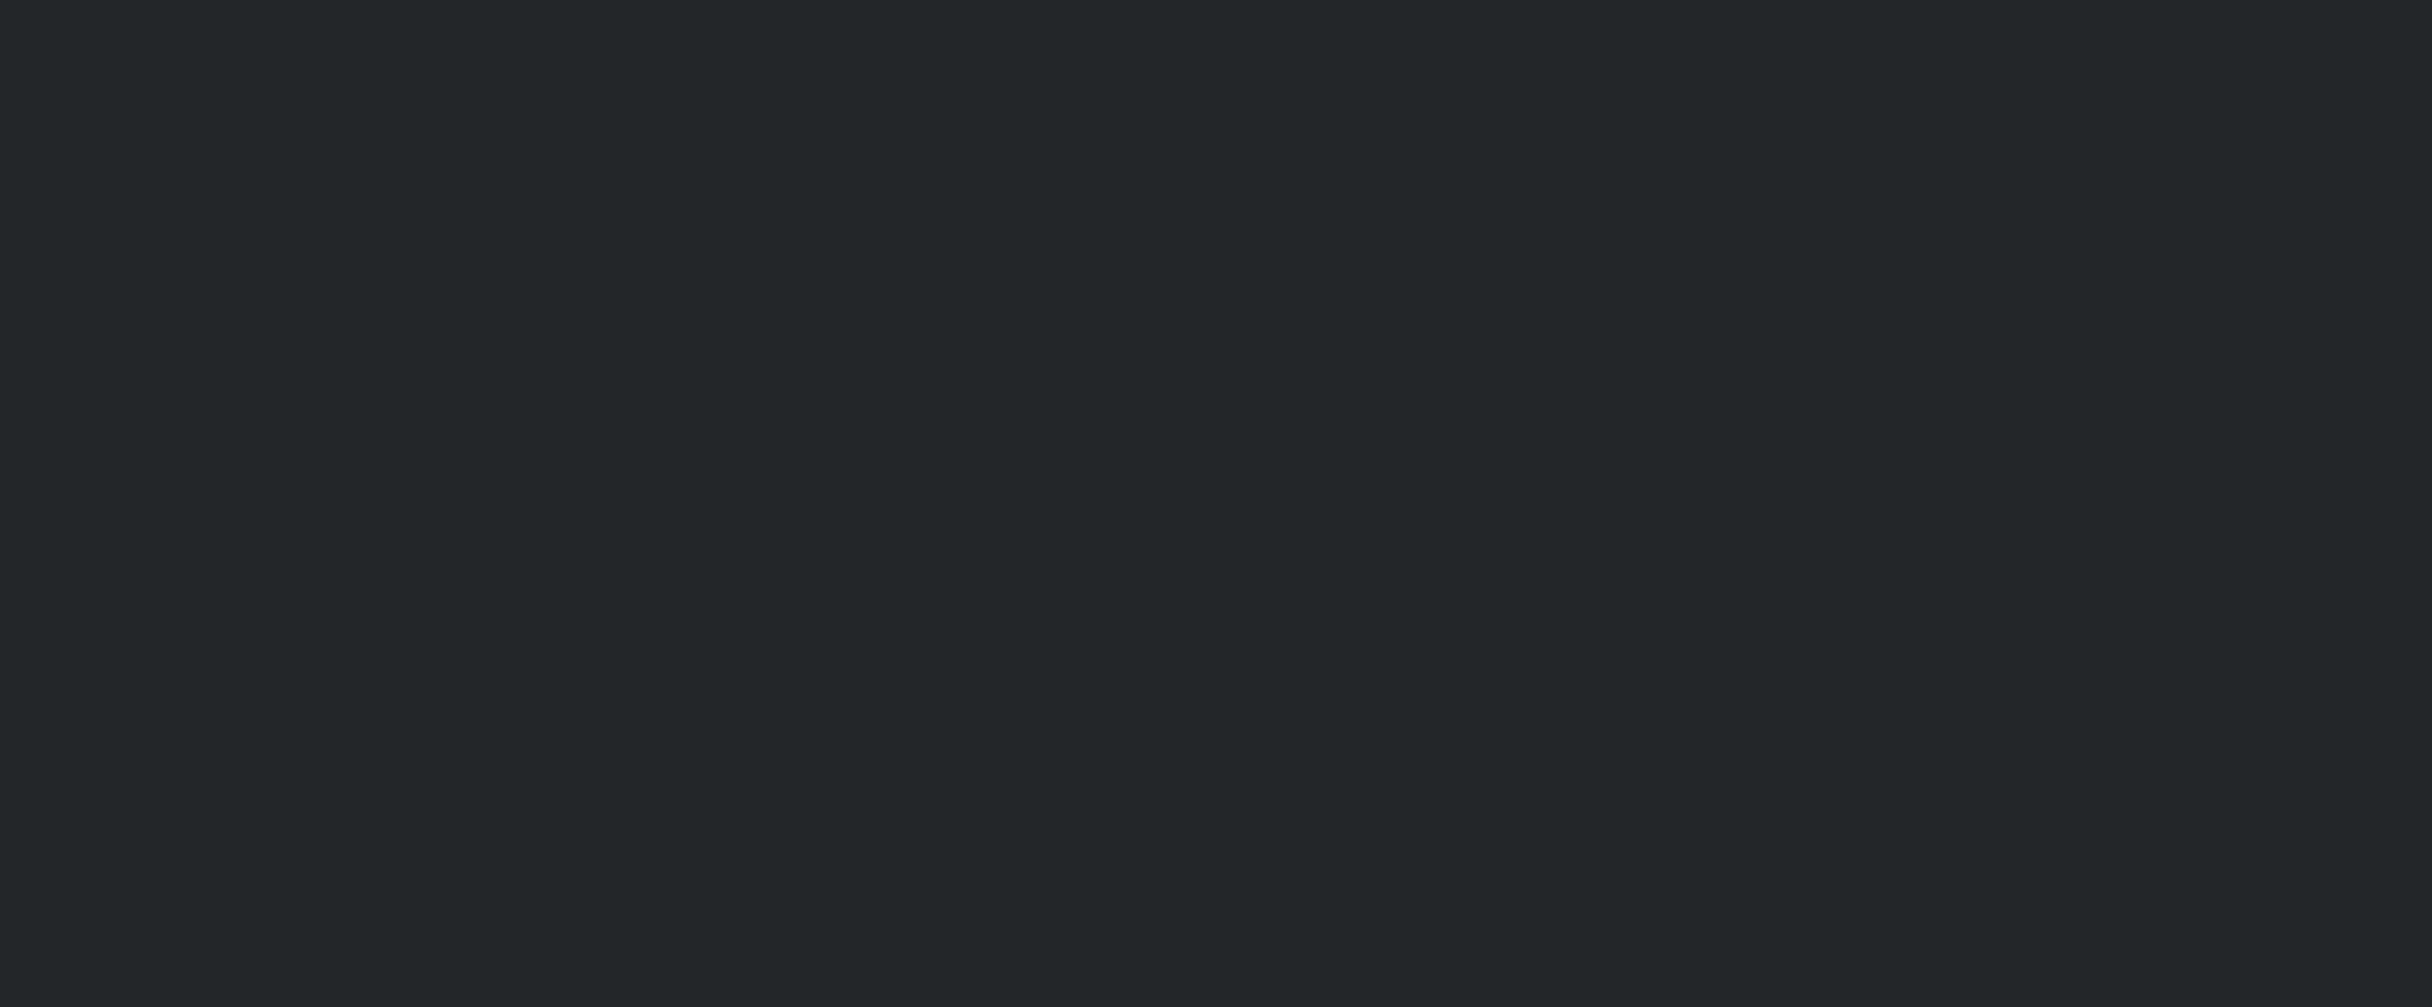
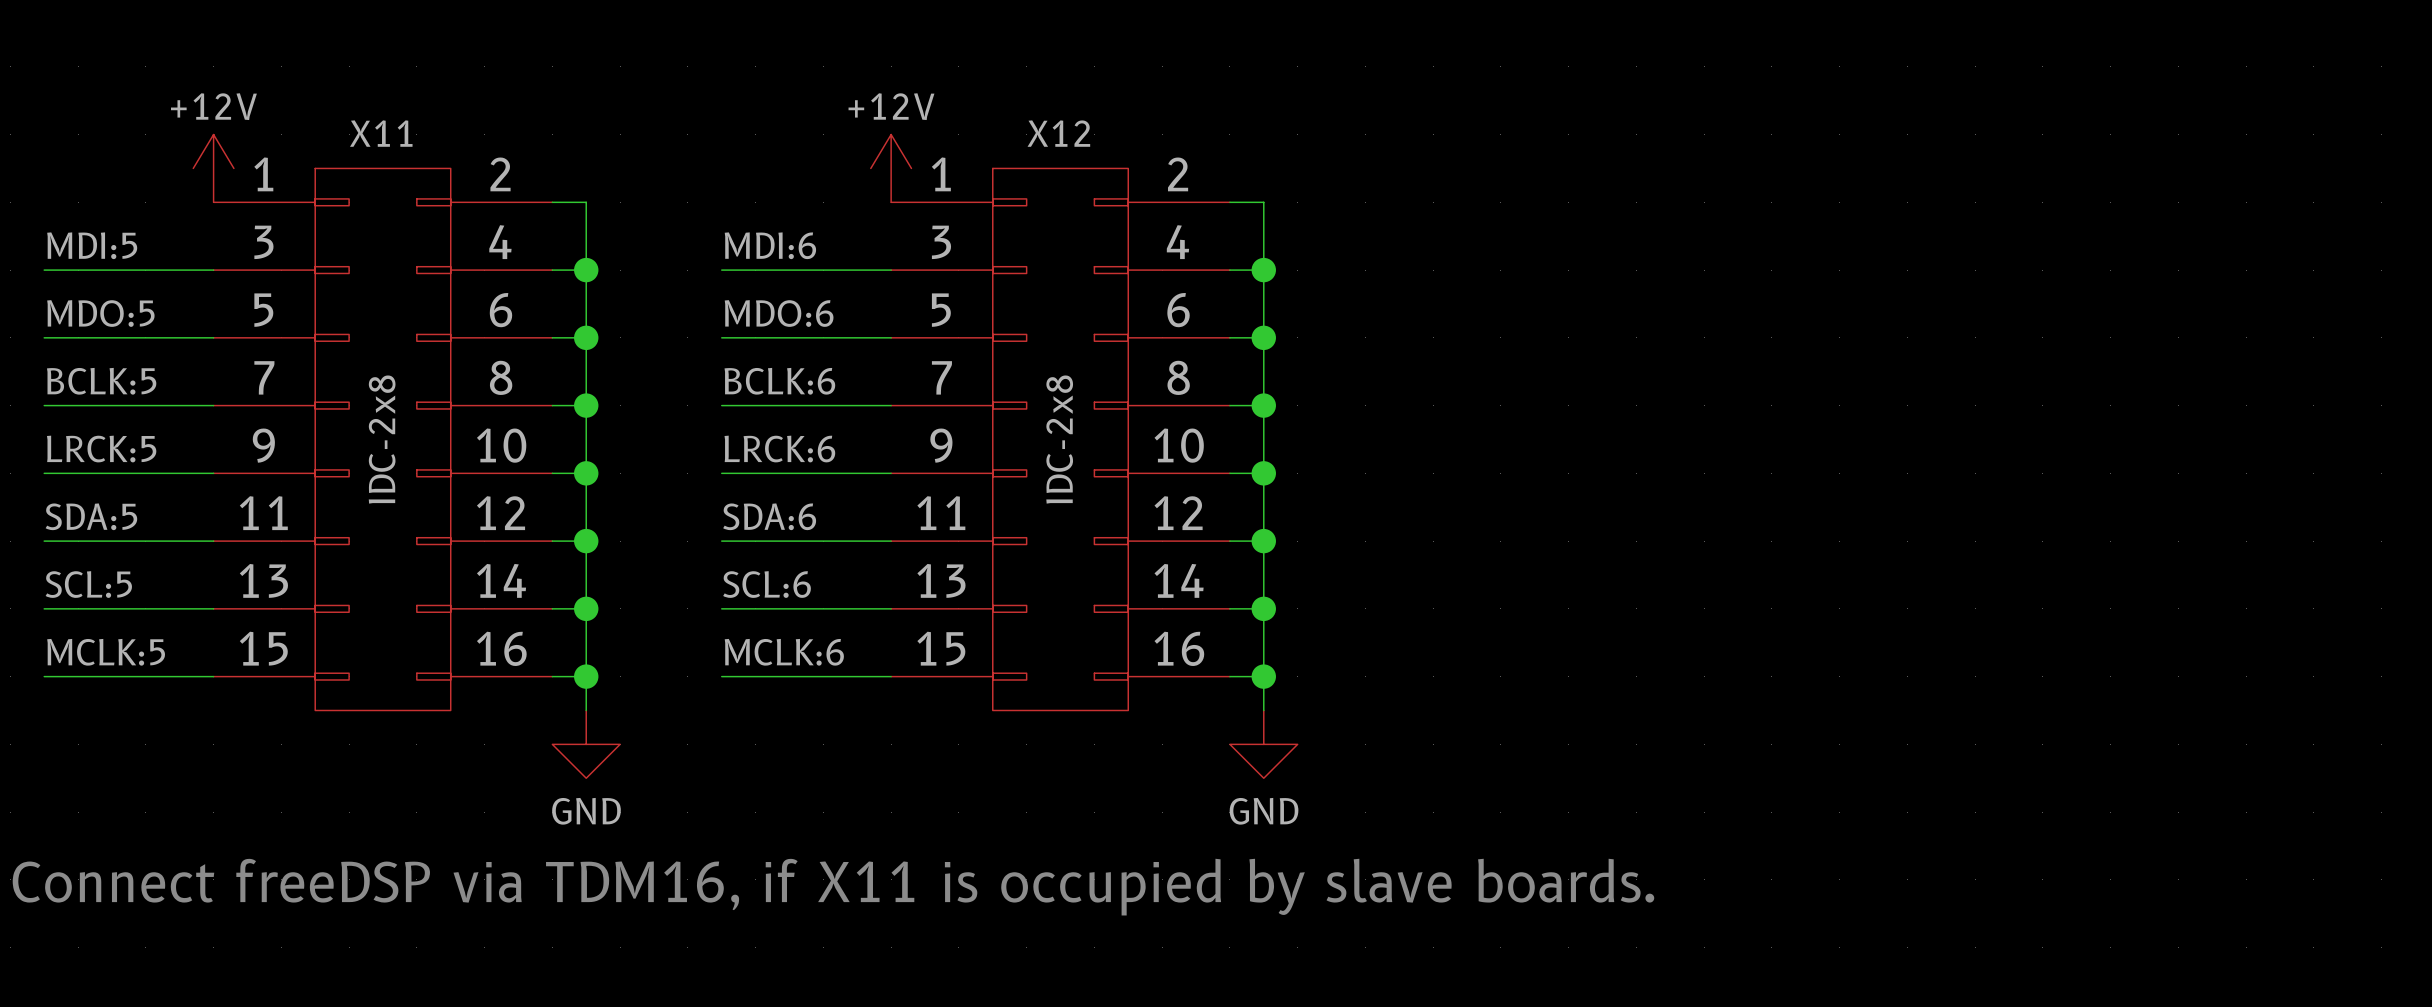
power symbol: none -> +12V (213, 168)
power symbol: none -> +12V (891, 168)
wire: none -> (552, 202) (586, 202) (586, 710)
wire: none -> (1229, 202) (1263, 202) (1263, 710)
label: none -> MDI:5 (92, 245)
label: none -> MDI:6 (770, 245)
wire: none -> (44, 270) (213, 270)
wire: none -> (552, 270) (586, 270)
junction: none -> (586, 270)
wire: none -> (721, 270) (891, 270)
wire: none -> (1229, 270) (1263, 270)
junction: none -> (1263, 270)
label: none -> MDO:5 (100, 313)
label: none -> MDO:6 (779, 313)
wire: none -> (44, 337) (213, 337)
wire: none -> (552, 337) (586, 337)
junction: none -> (586, 337)
wire: none -> (721, 337) (891, 337)
wire: none -> (1229, 337) (1263, 337)
junction: none -> (1263, 337)
label: none -> BCLK:5 (101, 381)
label: none -> BCLK:6 (779, 381)
wire: none -> (44, 405) (213, 405)
wire: none -> (552, 405) (586, 405)
junction: none -> (586, 405)
wire: none -> (721, 405) (891, 405)
wire: none -> (1229, 405) (1263, 405)
junction: none -> (1263, 405)
X11: none -> IDC-2x8 (382, 439)
X12: none -> IDC-2x8 (1060, 439)
label: none -> LRCK:5 (101, 449)
label: none -> LRCK:6 (779, 449)
wire: none -> (44, 473) (213, 473)
wire: none -> (552, 473) (586, 473)
junction: none -> (586, 473)
wire: none -> (721, 473) (891, 473)
wire: none -> (1229, 473) (1263, 473)
junction: none -> (1263, 473)
label: none -> SDA:5 (91, 516)
label: none -> SDA:6 (769, 516)
wire: none -> (44, 541) (213, 541)
wire: none -> (552, 541) (586, 541)
junction: none -> (586, 541)
wire: none -> (721, 541) (891, 541)
wire: none -> (1229, 541) (1263, 541)
junction: none -> (1263, 541)
label: none -> SCL:5 (88, 584)
label: none -> SCL:6 (767, 584)
wire: none -> (44, 608) (213, 608)
wire: none -> (552, 608) (586, 608)
junction: none -> (586, 608)
wire: none -> (721, 608) (891, 608)
wire: none -> (1229, 608) (1263, 608)
junction: none -> (1263, 608)
label: none -> MCLK:5 (106, 652)
label: none -> MCLK:6 (784, 652)
wire: none -> (44, 676) (213, 676)
wire: none -> (552, 676) (586, 676)
junction: none -> (586, 676)
wire: none -> (721, 676) (891, 676)
wire: none -> (1229, 676) (1263, 676)
junction: none -> (1263, 676)
power symbol: none -> GND (586, 744)
power symbol: none -> GND (1263, 744)
text: none -> Connect freeDSP via TDM16, if X11 is occupied by slave boards. (833, 887)

